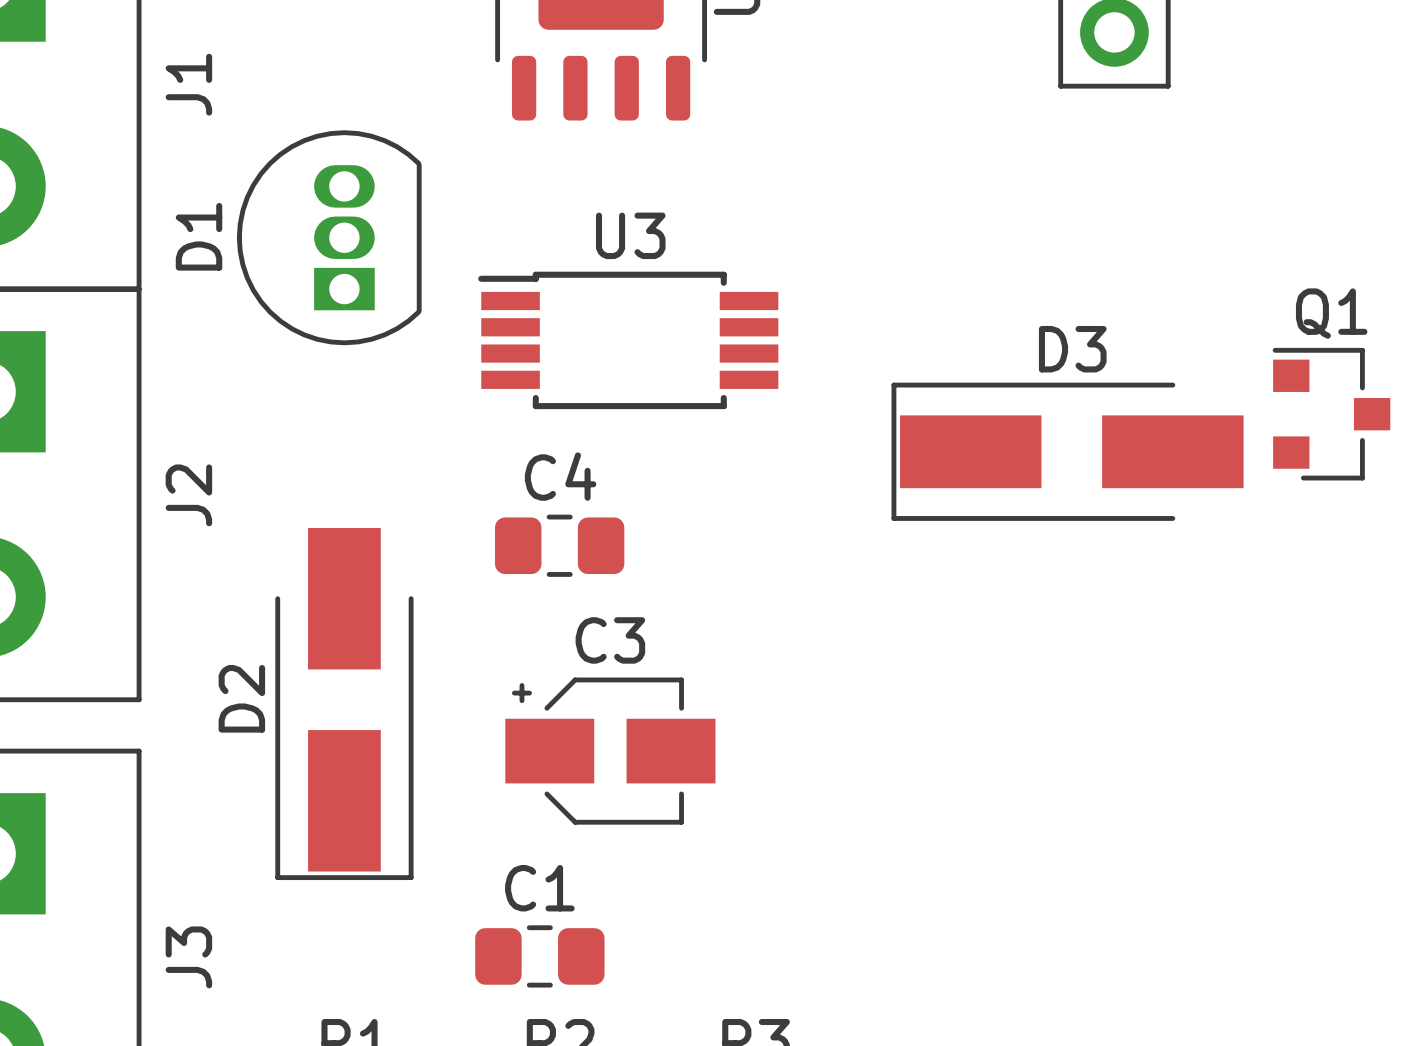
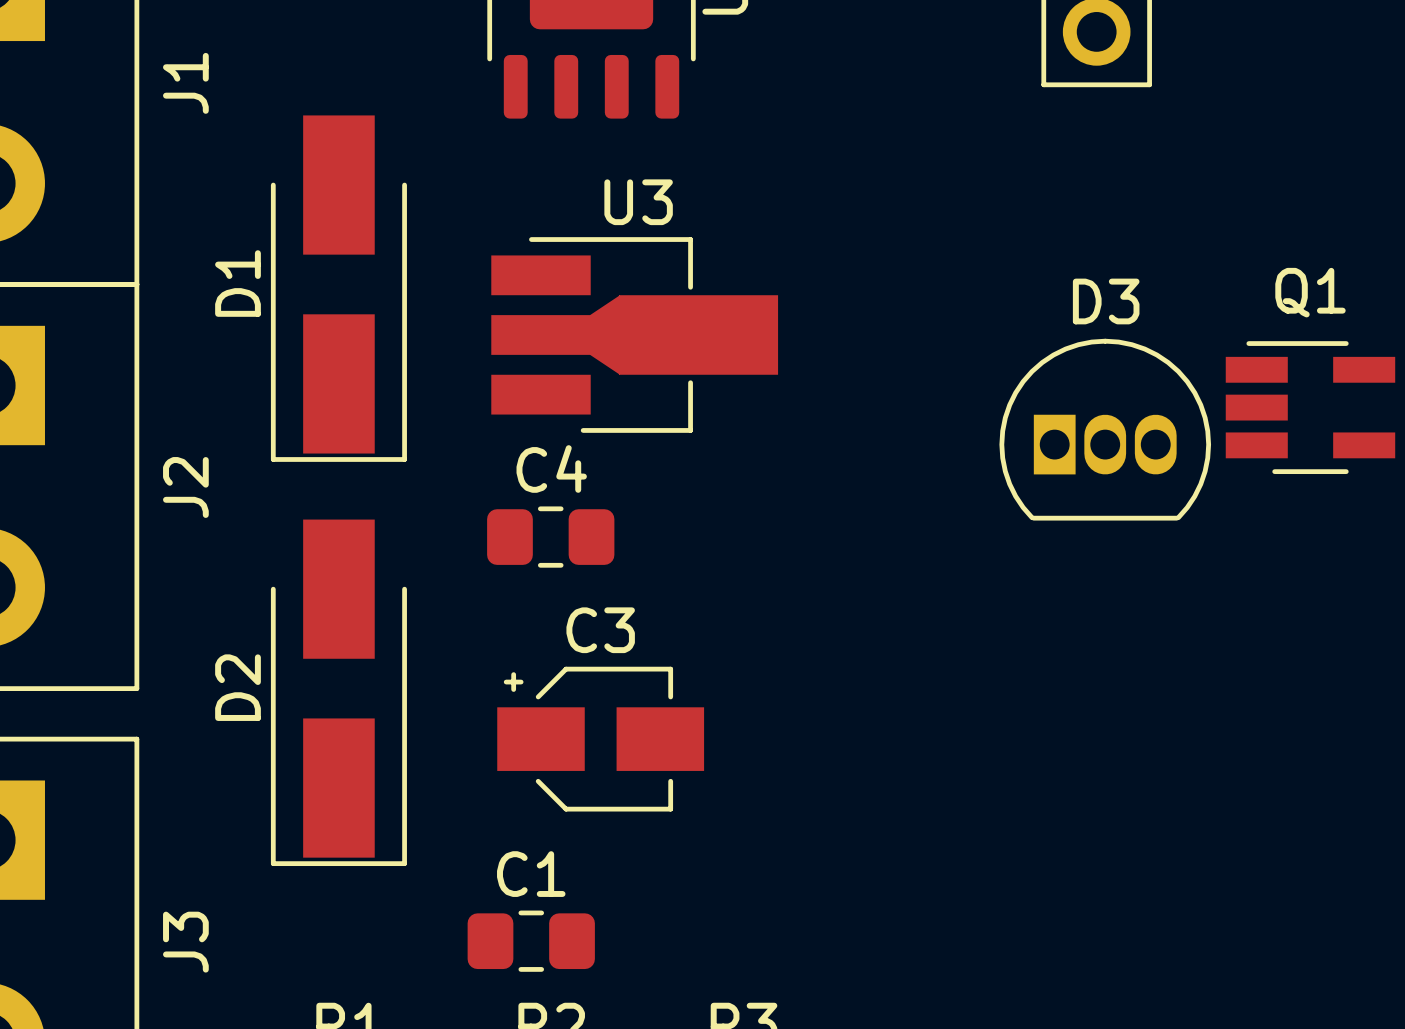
D1 footprint: [236, 130, 422, 346] -> [270, 115, 407, 462]
U3 footprint: [478, 271, 779, 410] -> [491, 237, 779, 433]
Q1 footprint: [1272, 347, 1391, 481] -> [1225, 341, 1396, 475]
D3 footprint: [891, 382, 1244, 521] -> [999, 338, 1212, 521]

